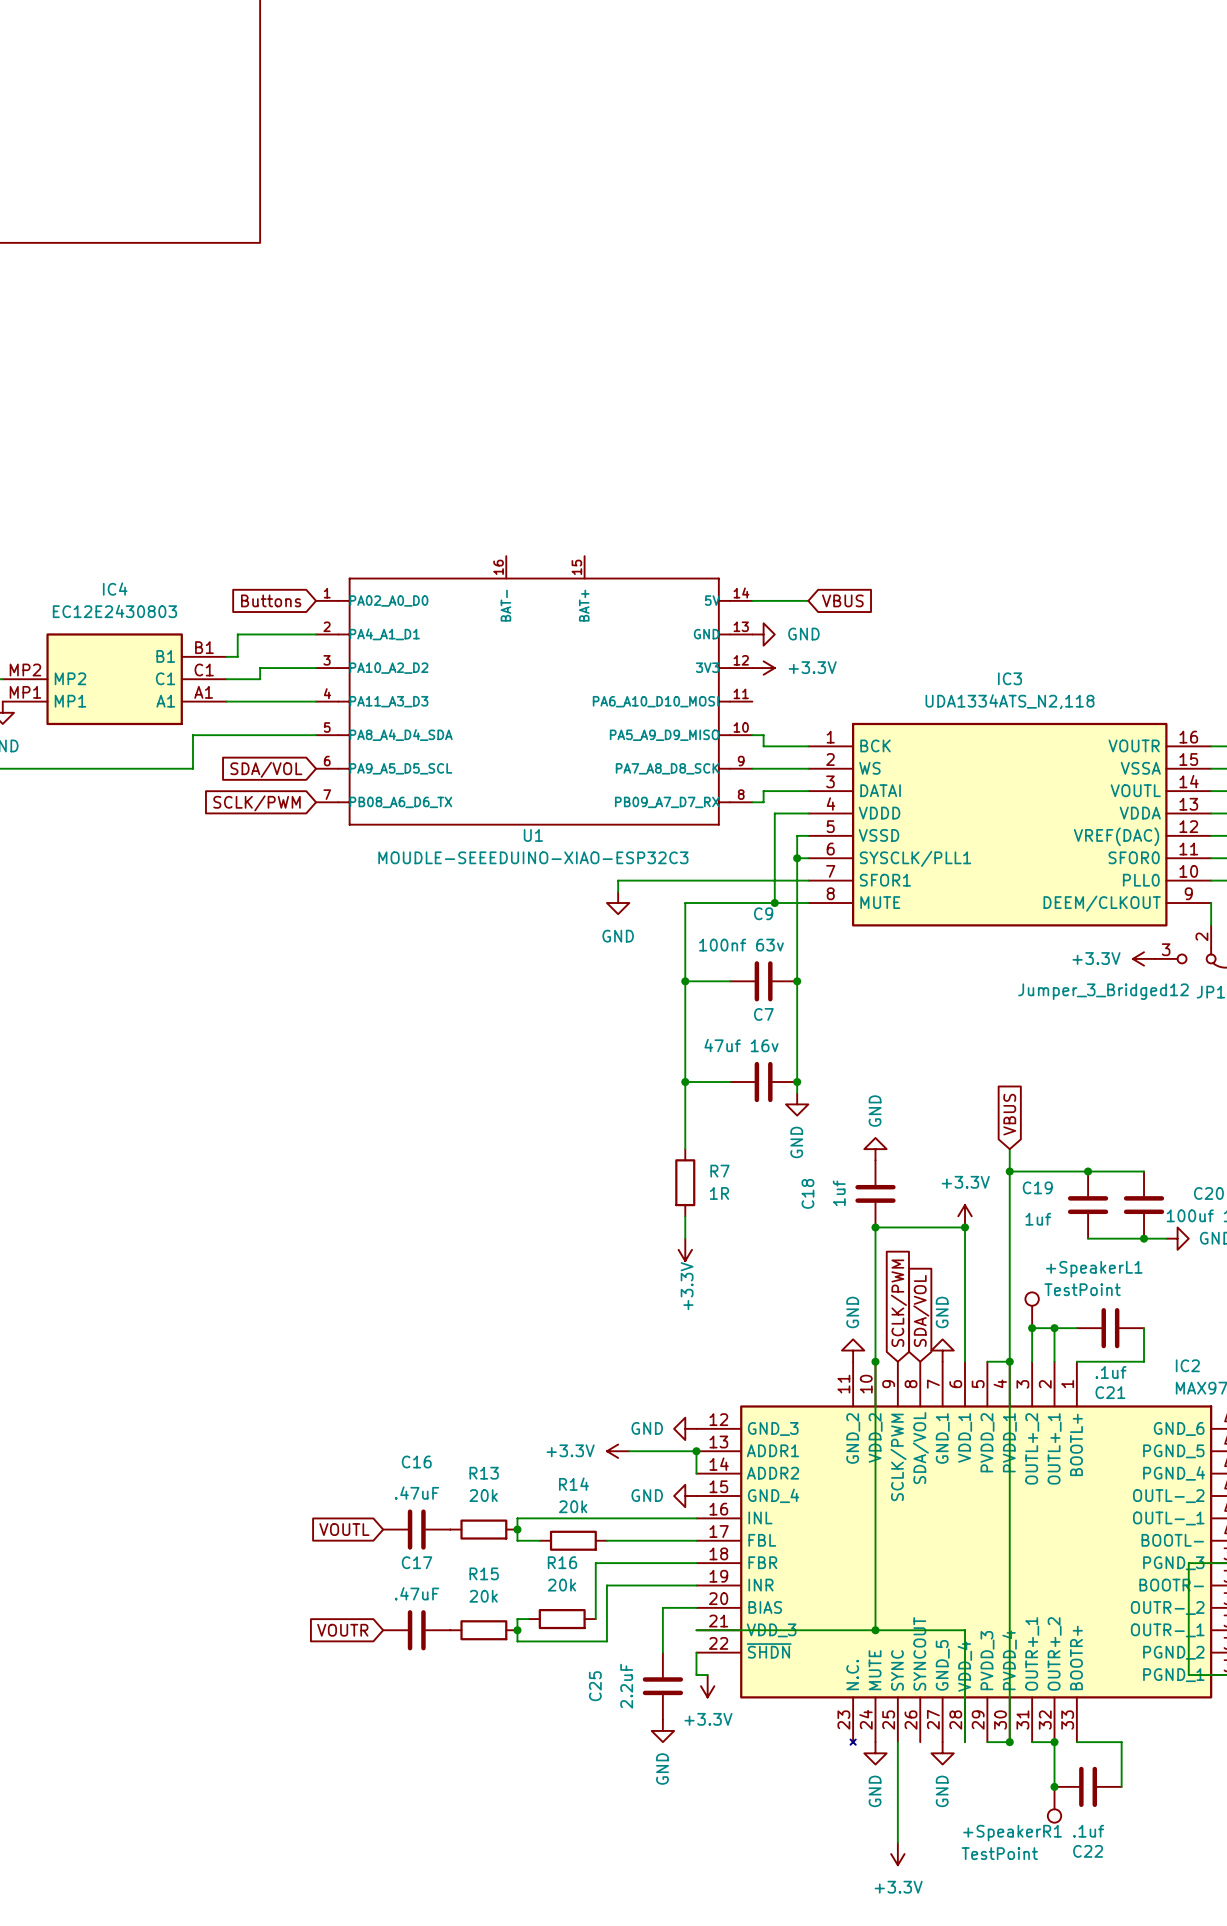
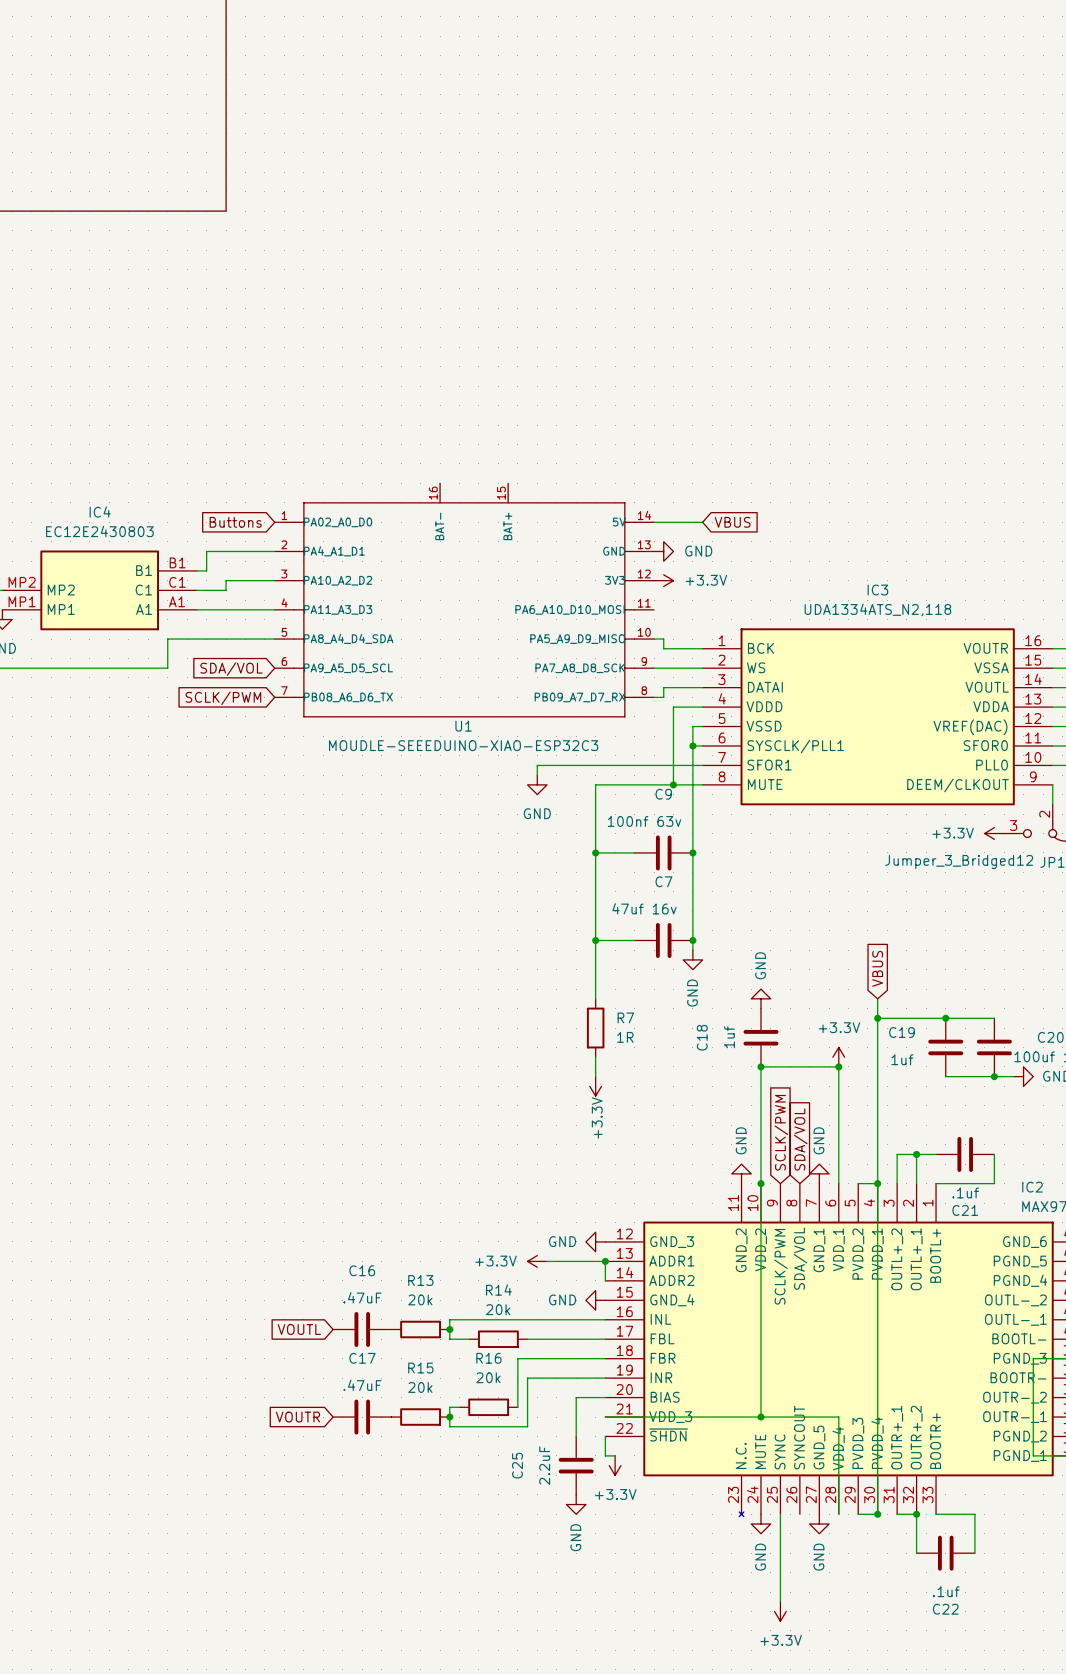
+SpeakerL1: TestPoint (1032, 1310) -> none
junction: (1032, 1328) -> none
junction: (1054, 1786) -> none
+SpeakerR1: TestPoint (1054, 1804) -> none

